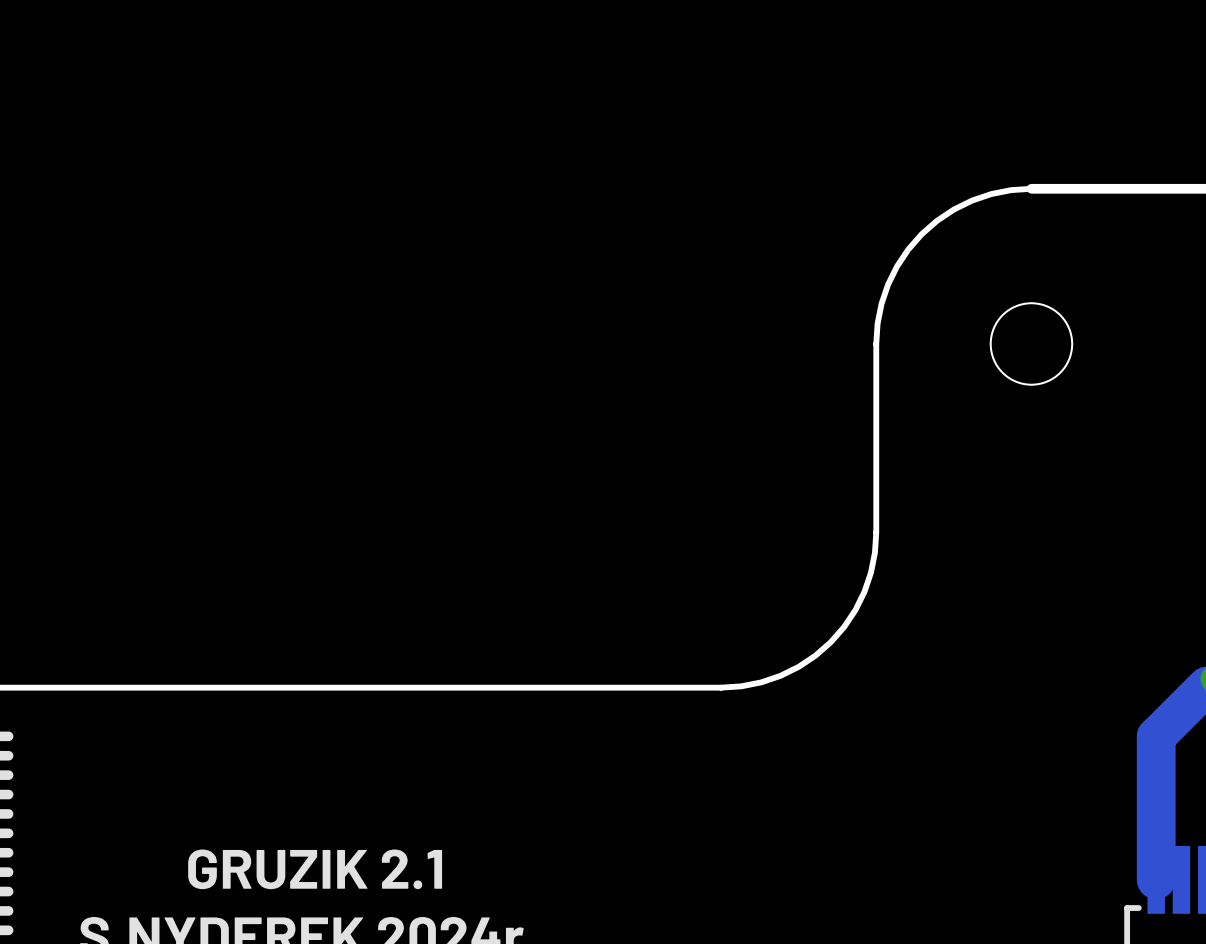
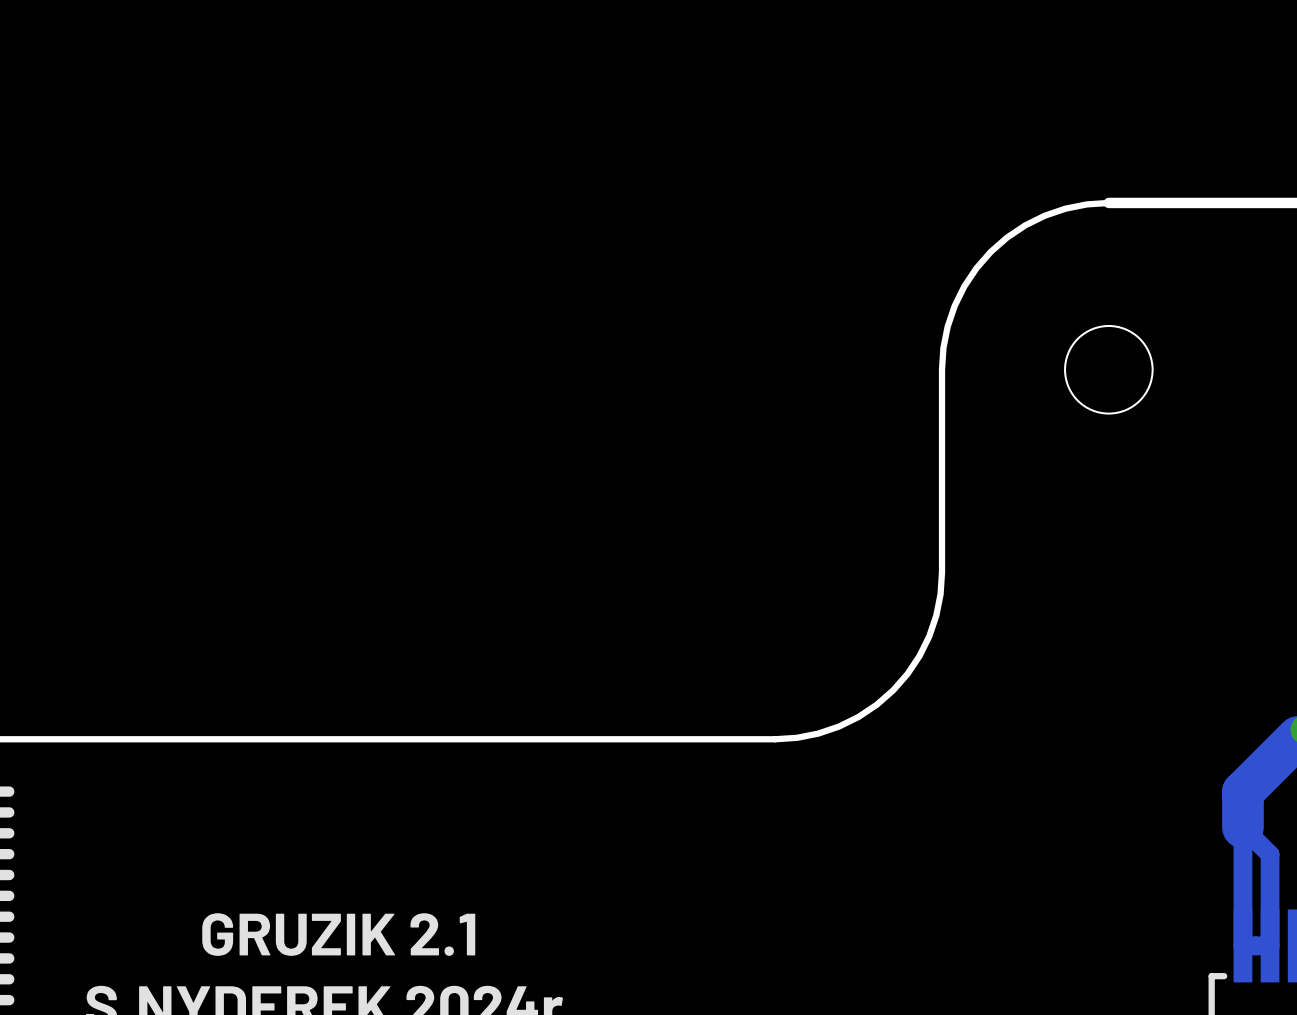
track: none -> (1242, 827) (1270, 854) (1270, 945)
track width: thick (1156, 769) (1156, 879) -> thin (1242, 827) (1242, 945)

